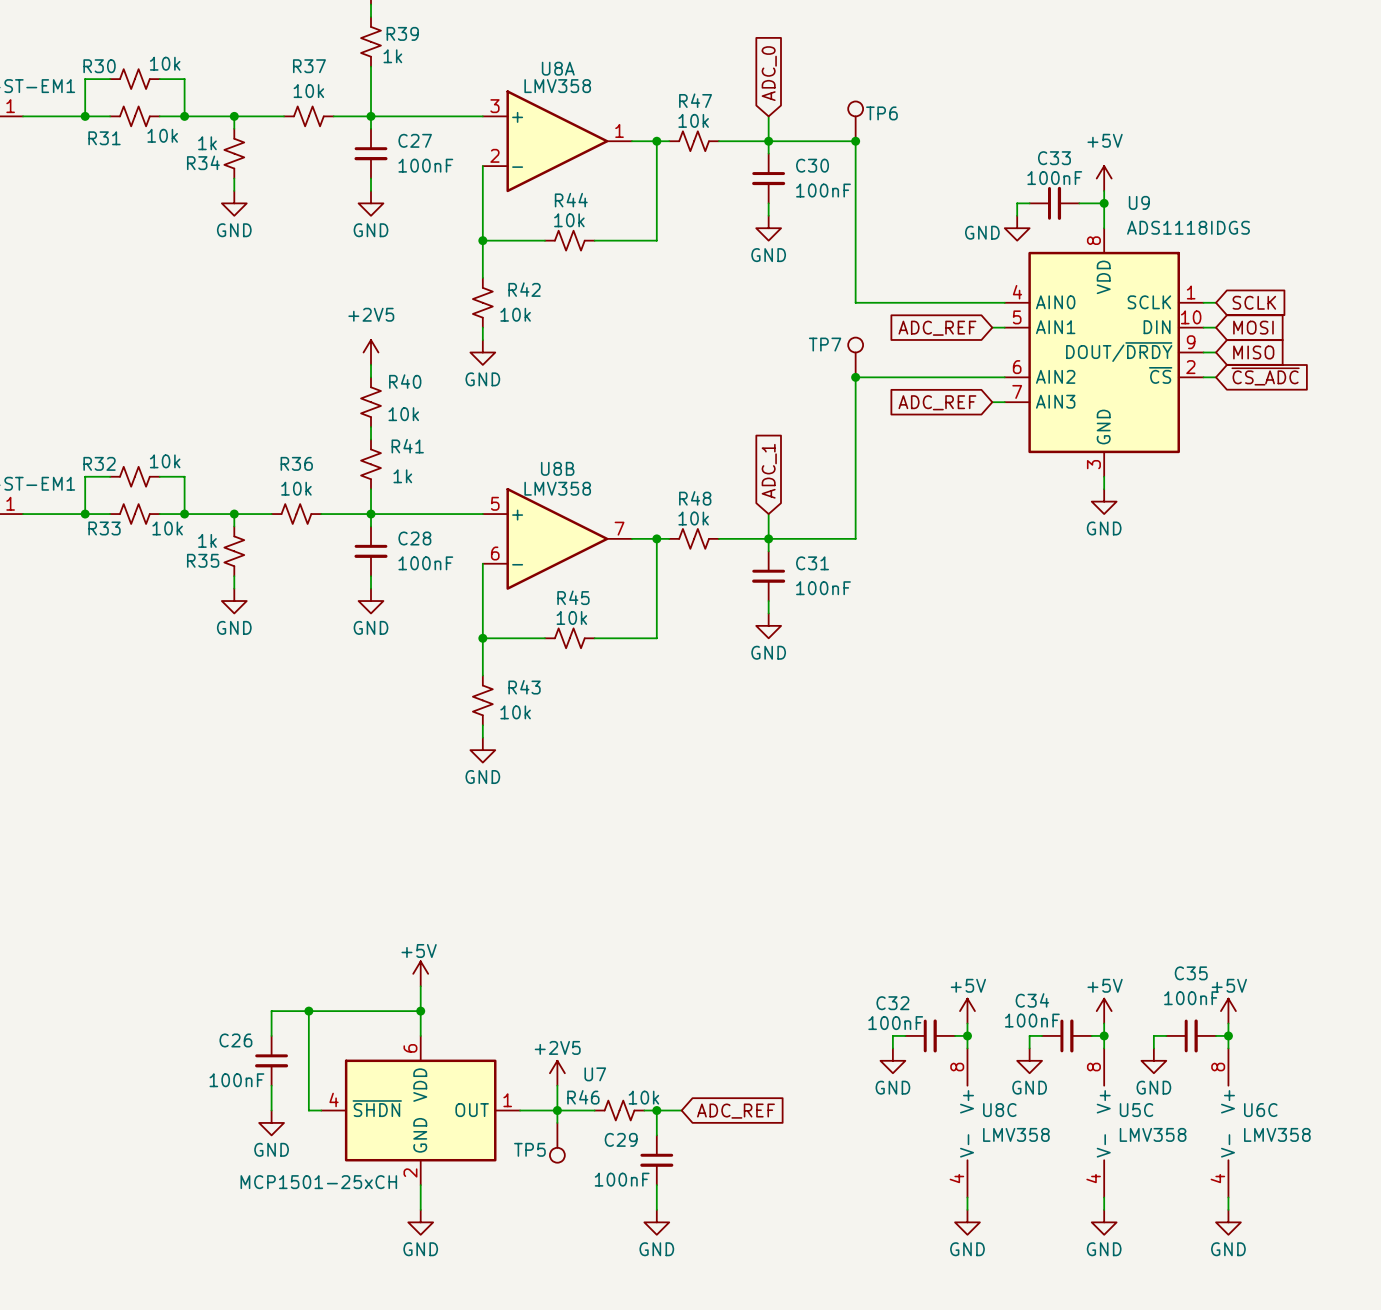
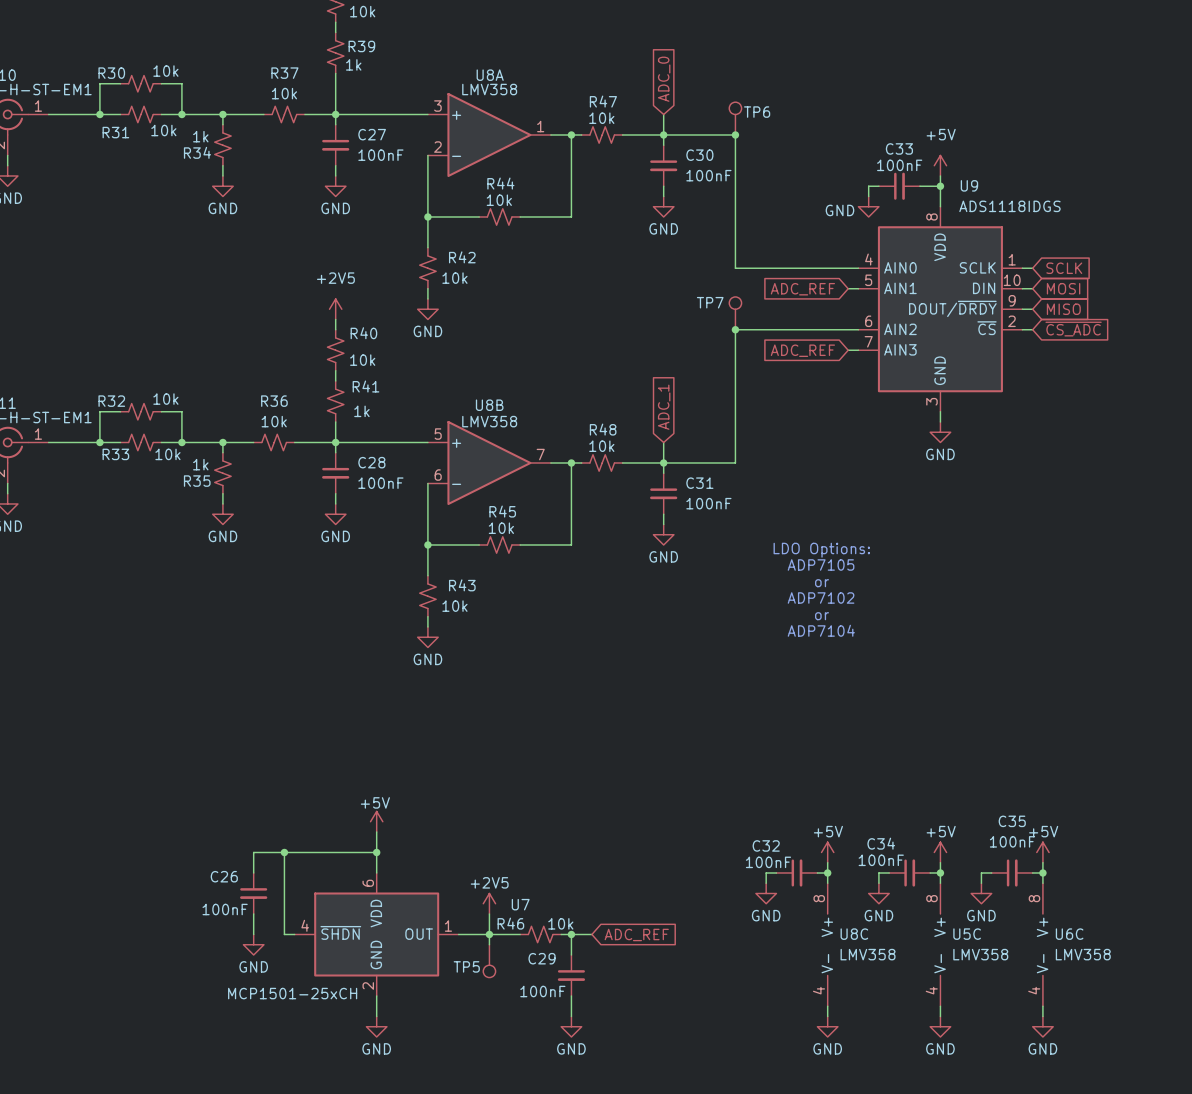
text: none -> LDO Options: (821, 550)
text: none -> ADP7105 (821, 564)
text: none -> or (822, 583)
text: none -> ADP7102 (821, 597)
text: none -> or (822, 616)
text: none -> ADP7104 (821, 630)

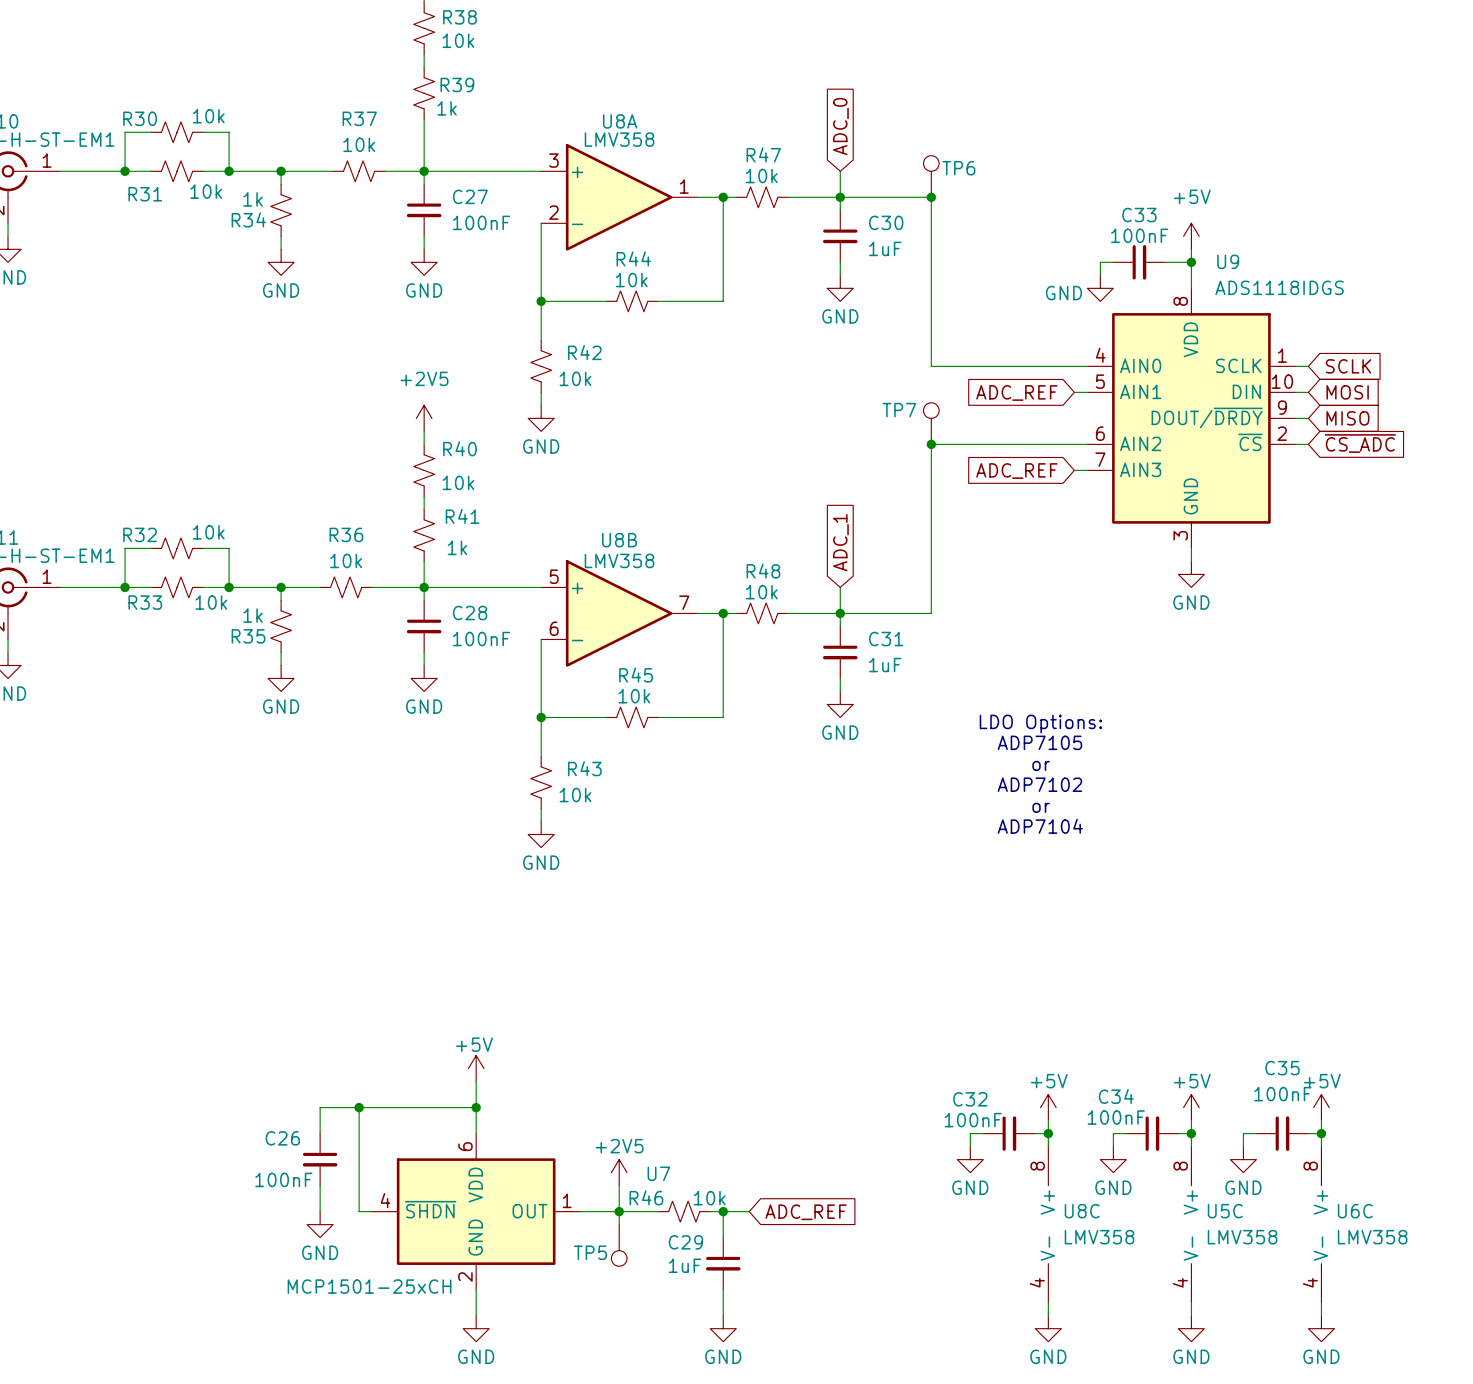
C30 value: 100nF (708, 175) -> 1uF (885, 248)
C31 value: 100nF (708, 503) -> 1uF (885, 665)
C29 value: 100nF (542, 991) -> 1uF (685, 1265)

